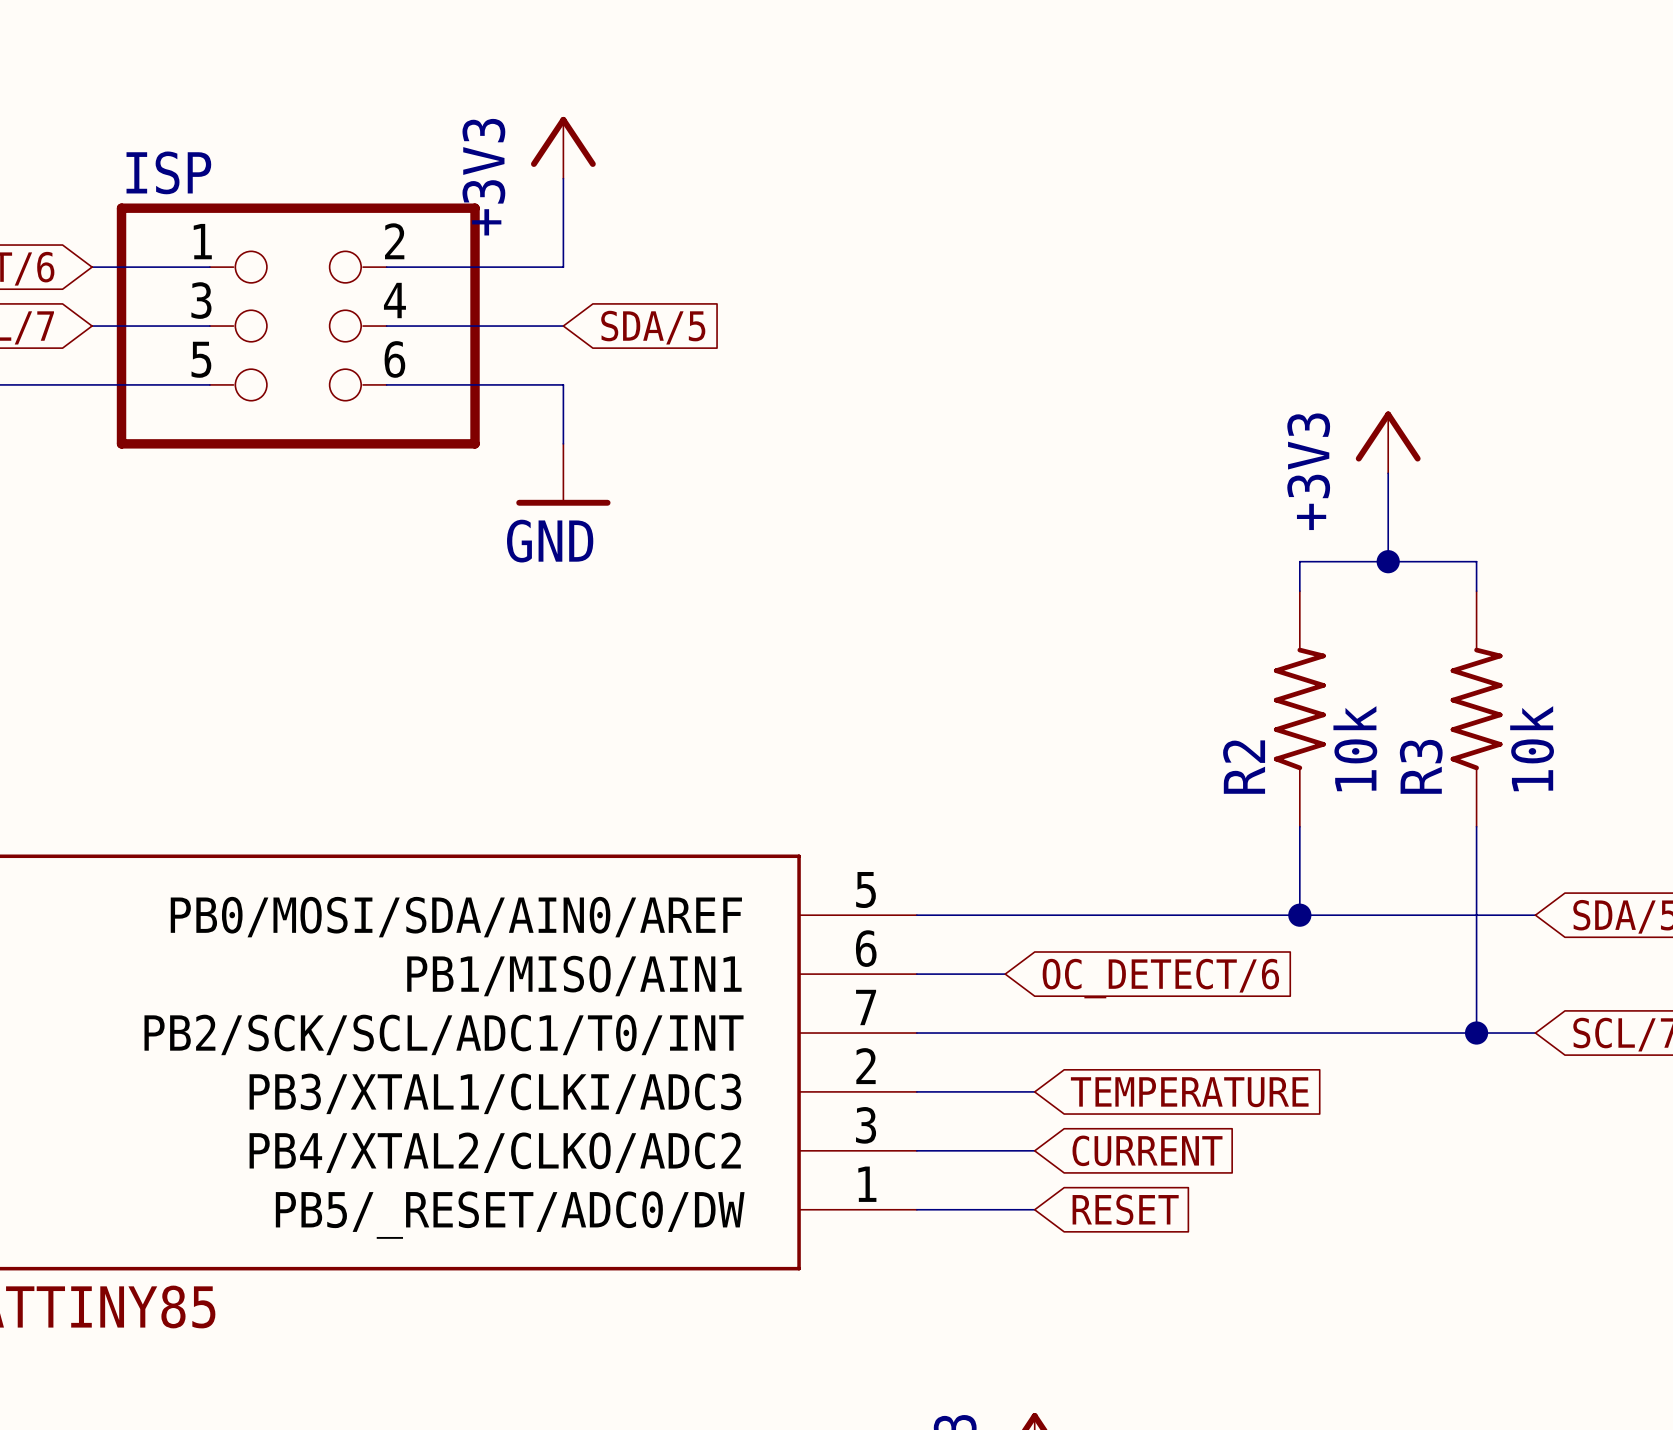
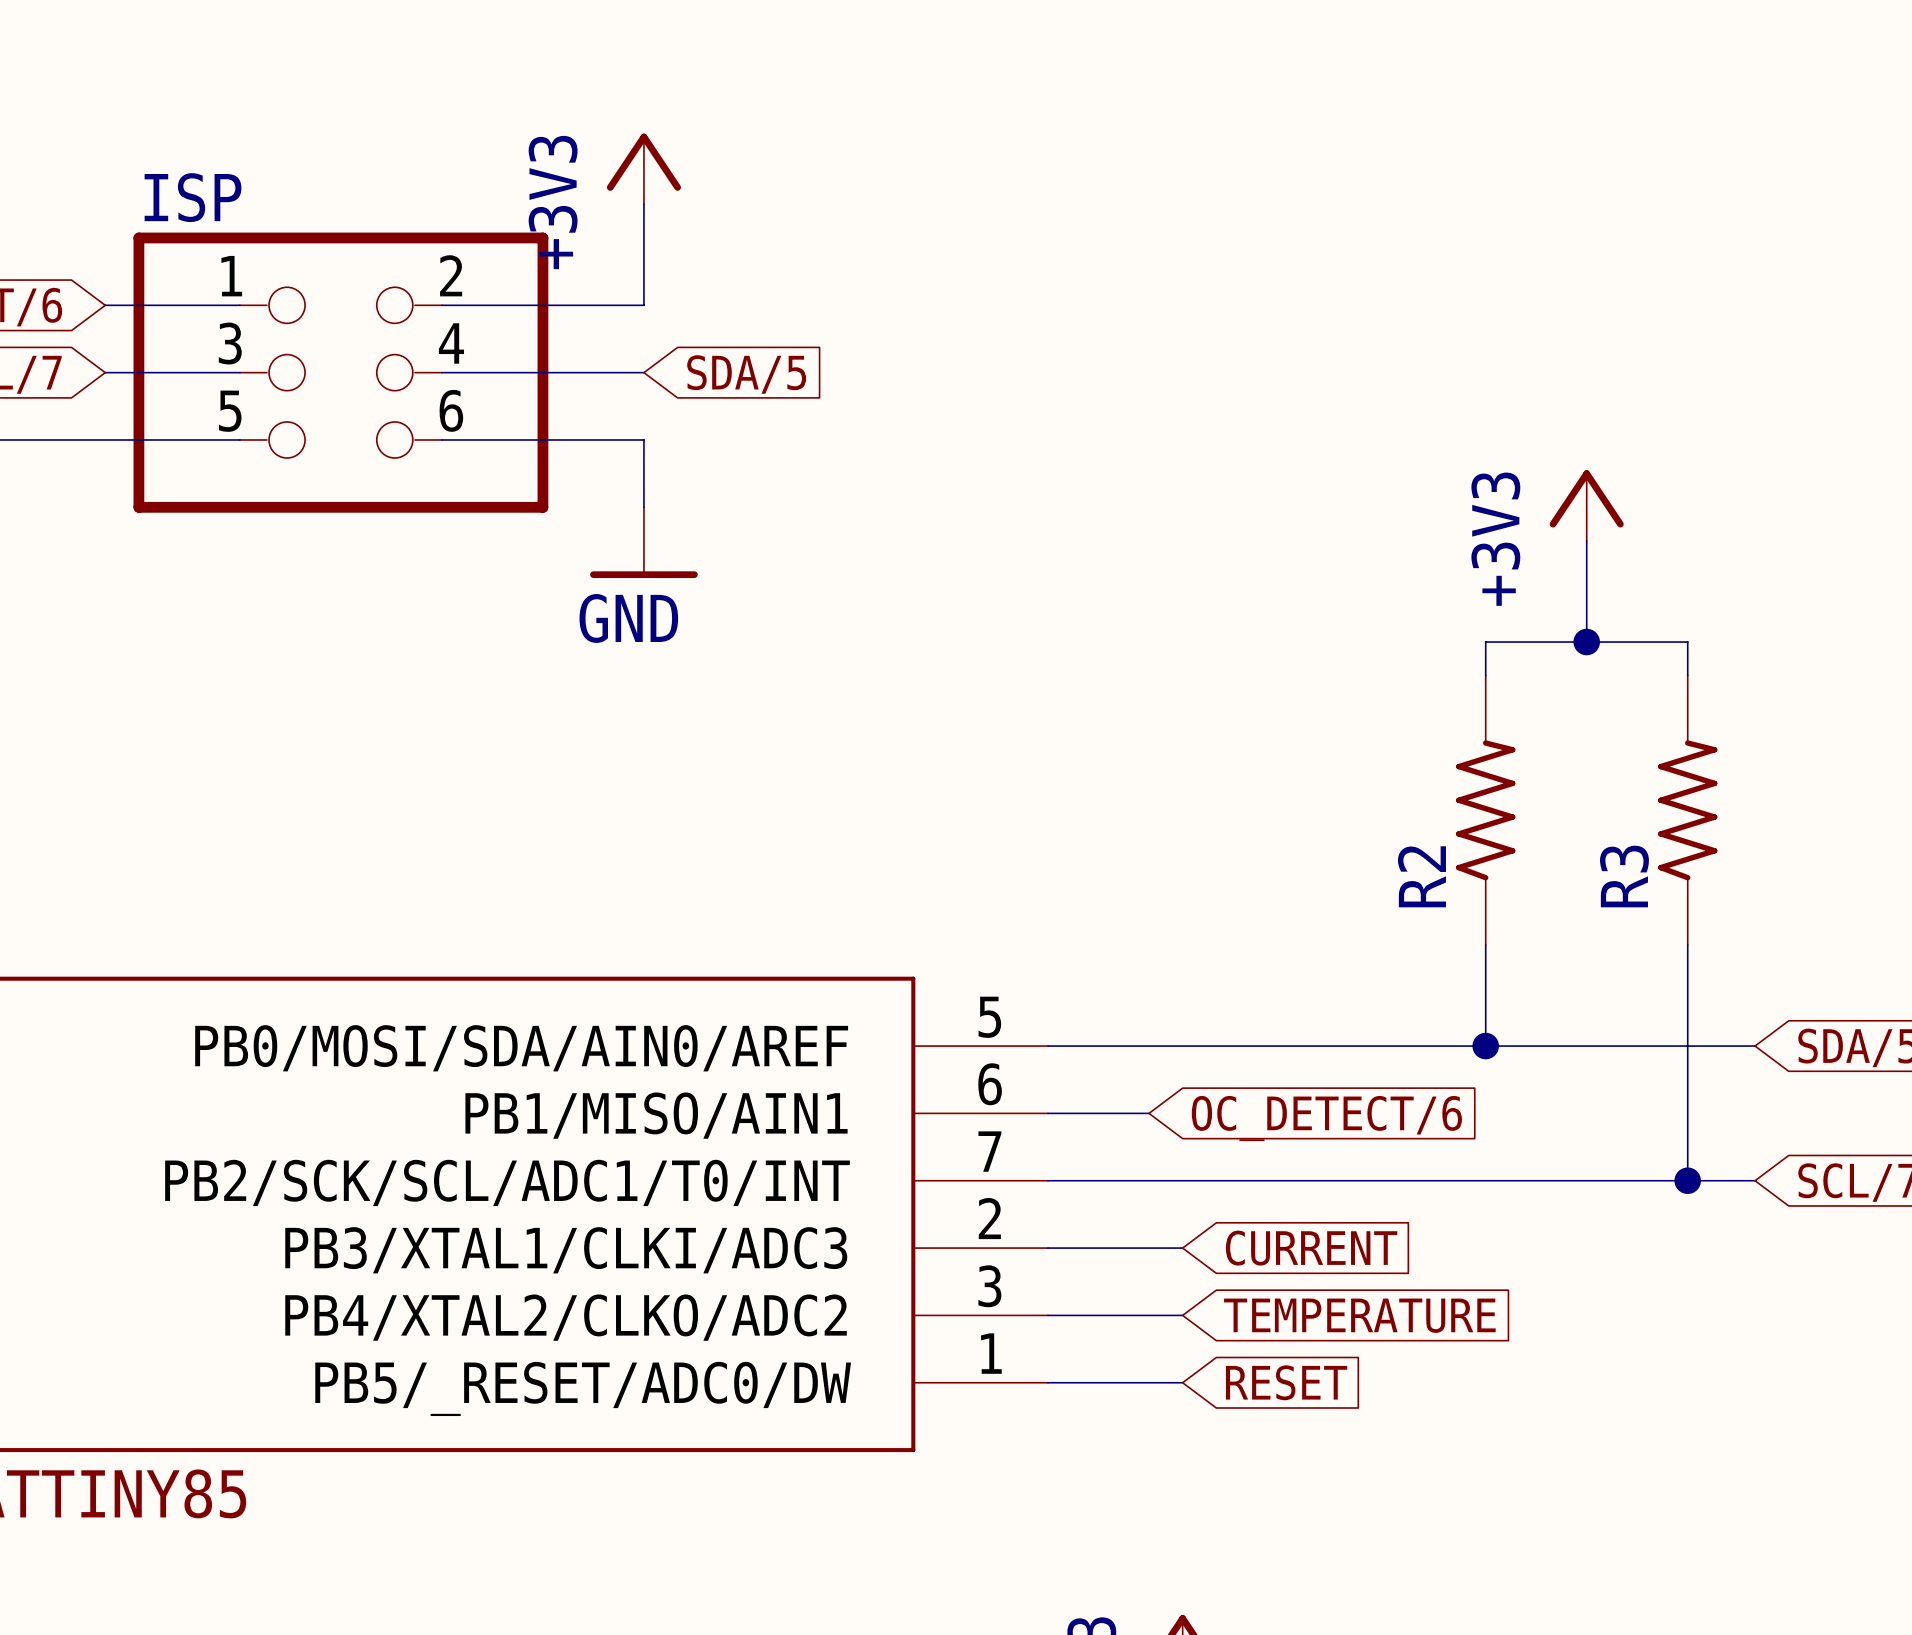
R2 value: 10k (1355, 748) -> none
R3 value: 10k (1532, 748) -> none
global label: TEMPERATURE (1189, 1092) -> CURRENT (1311, 1248)
global label: CURRENT (1147, 1150) -> TEMPERATURE (1359, 1315)

